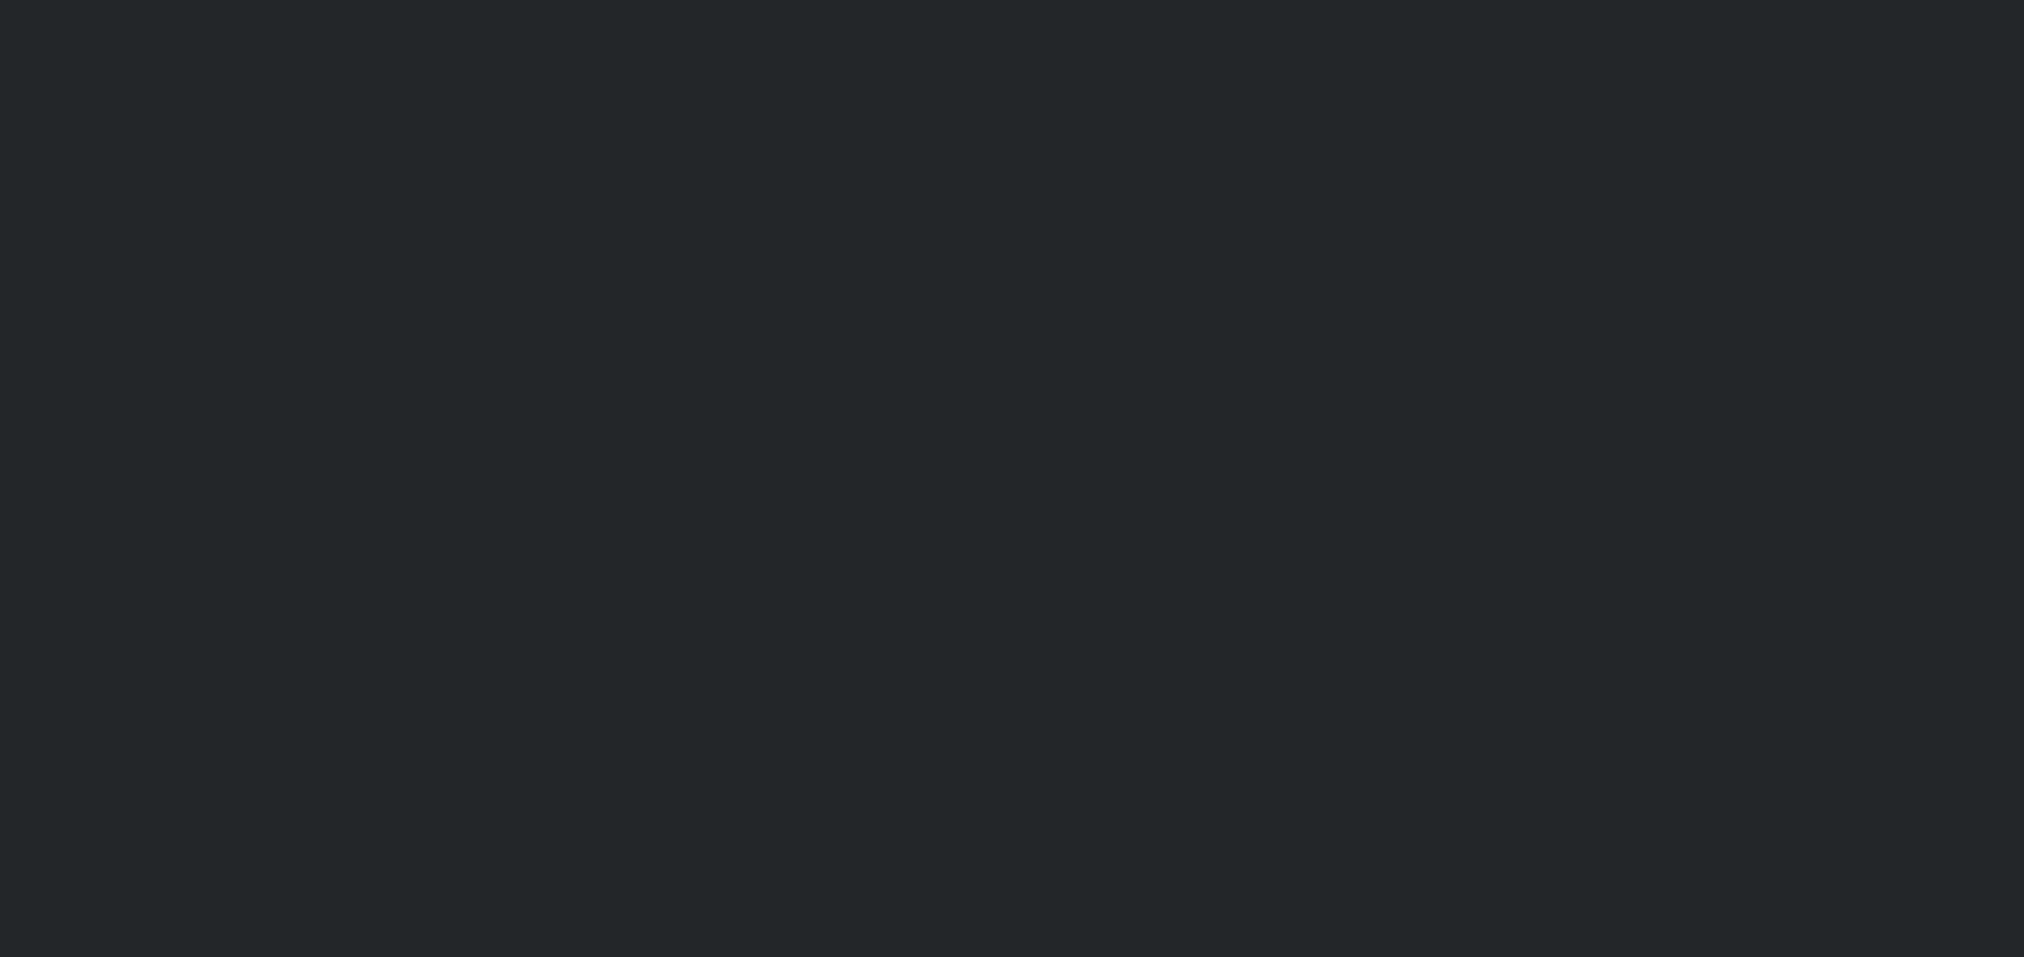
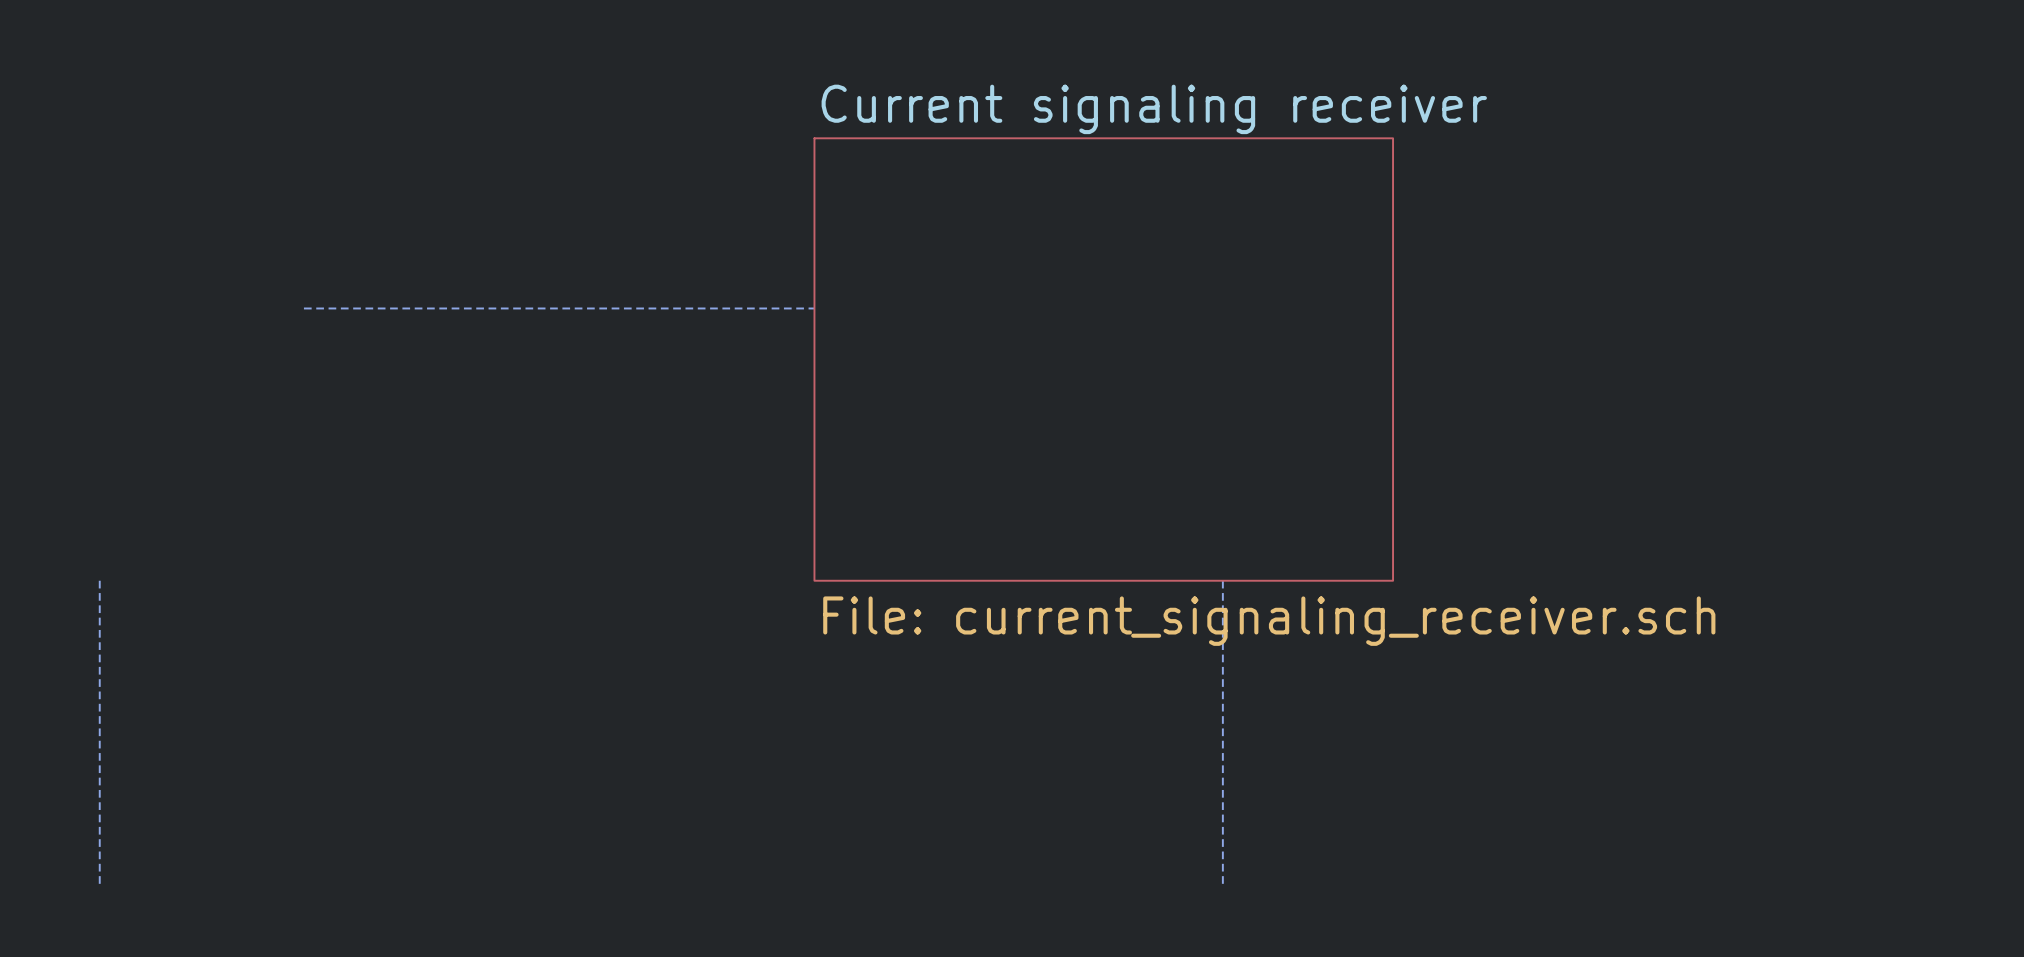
line: none -> (303, 308) (814, 308)
sheet Current signaling receiver: none -> File: current_signaling_receiver.sch (1103, 359)
line: none -> (99, 580) (99, 887)
line: none -> (1222, 580) (1222, 887)

